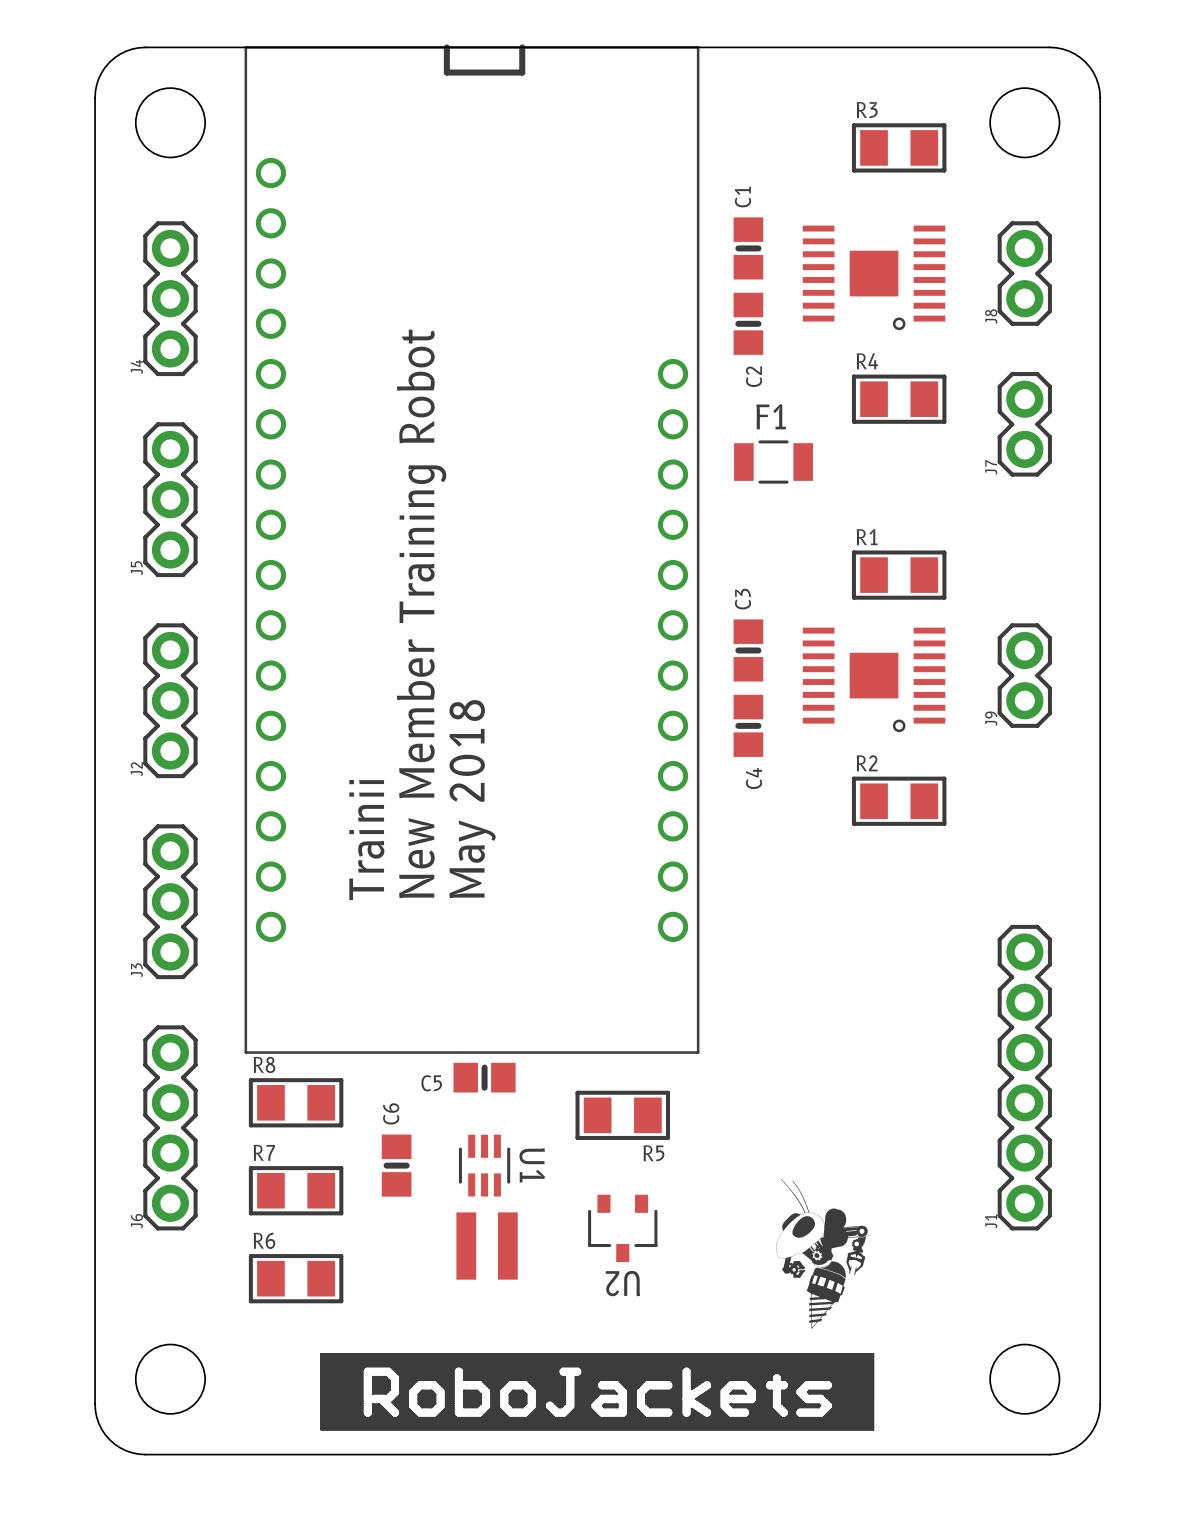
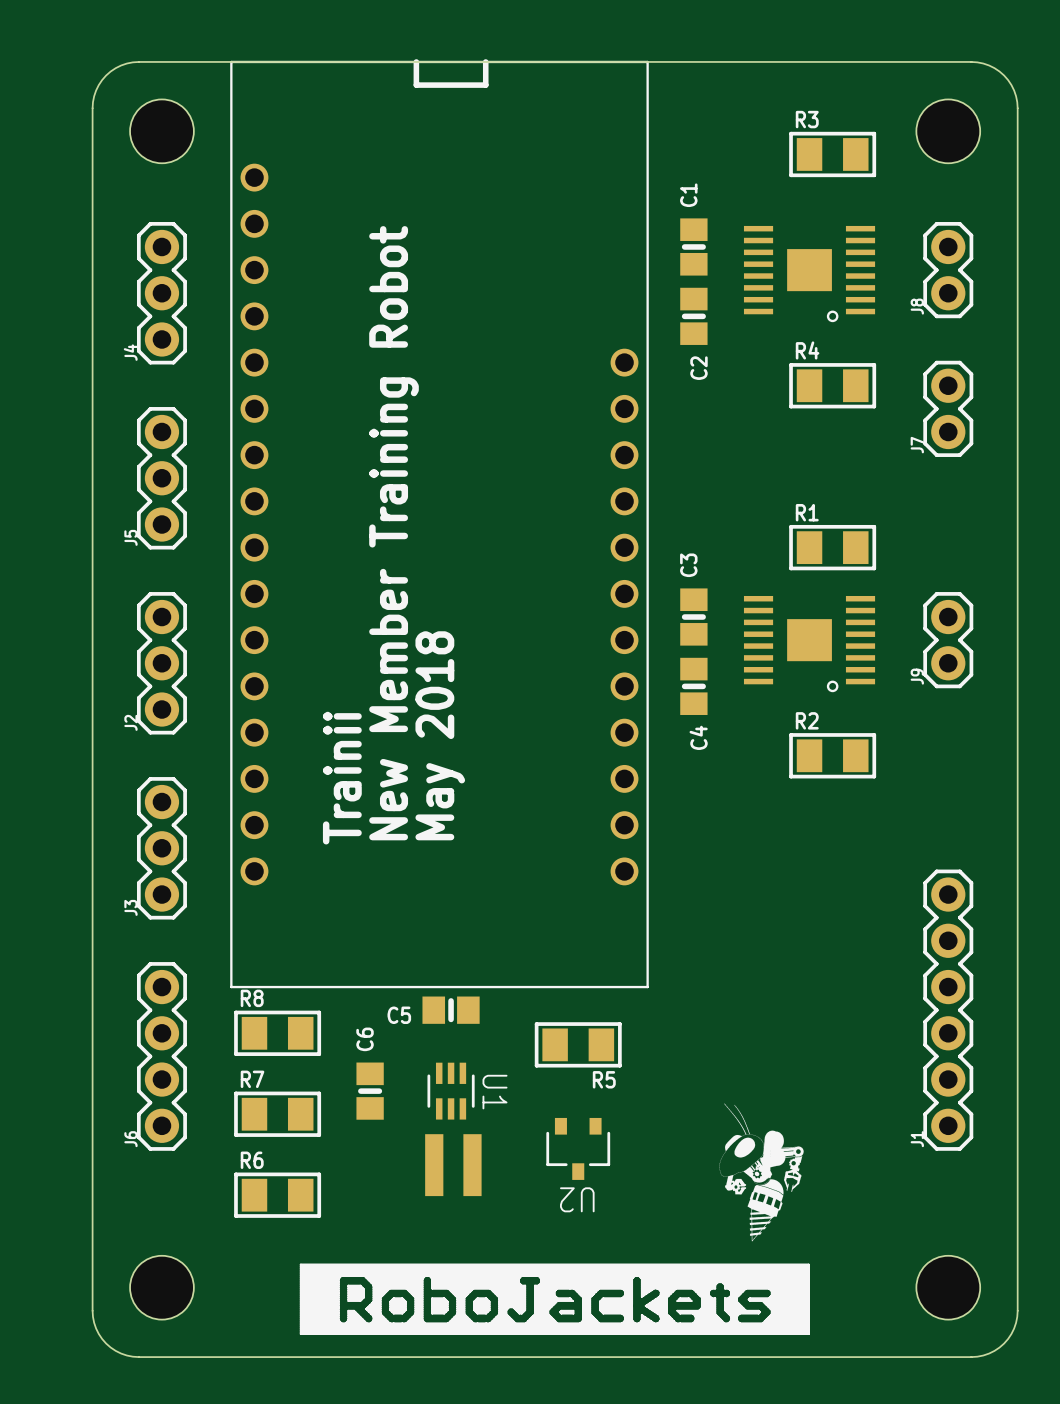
F1: (773, 462) -> none

